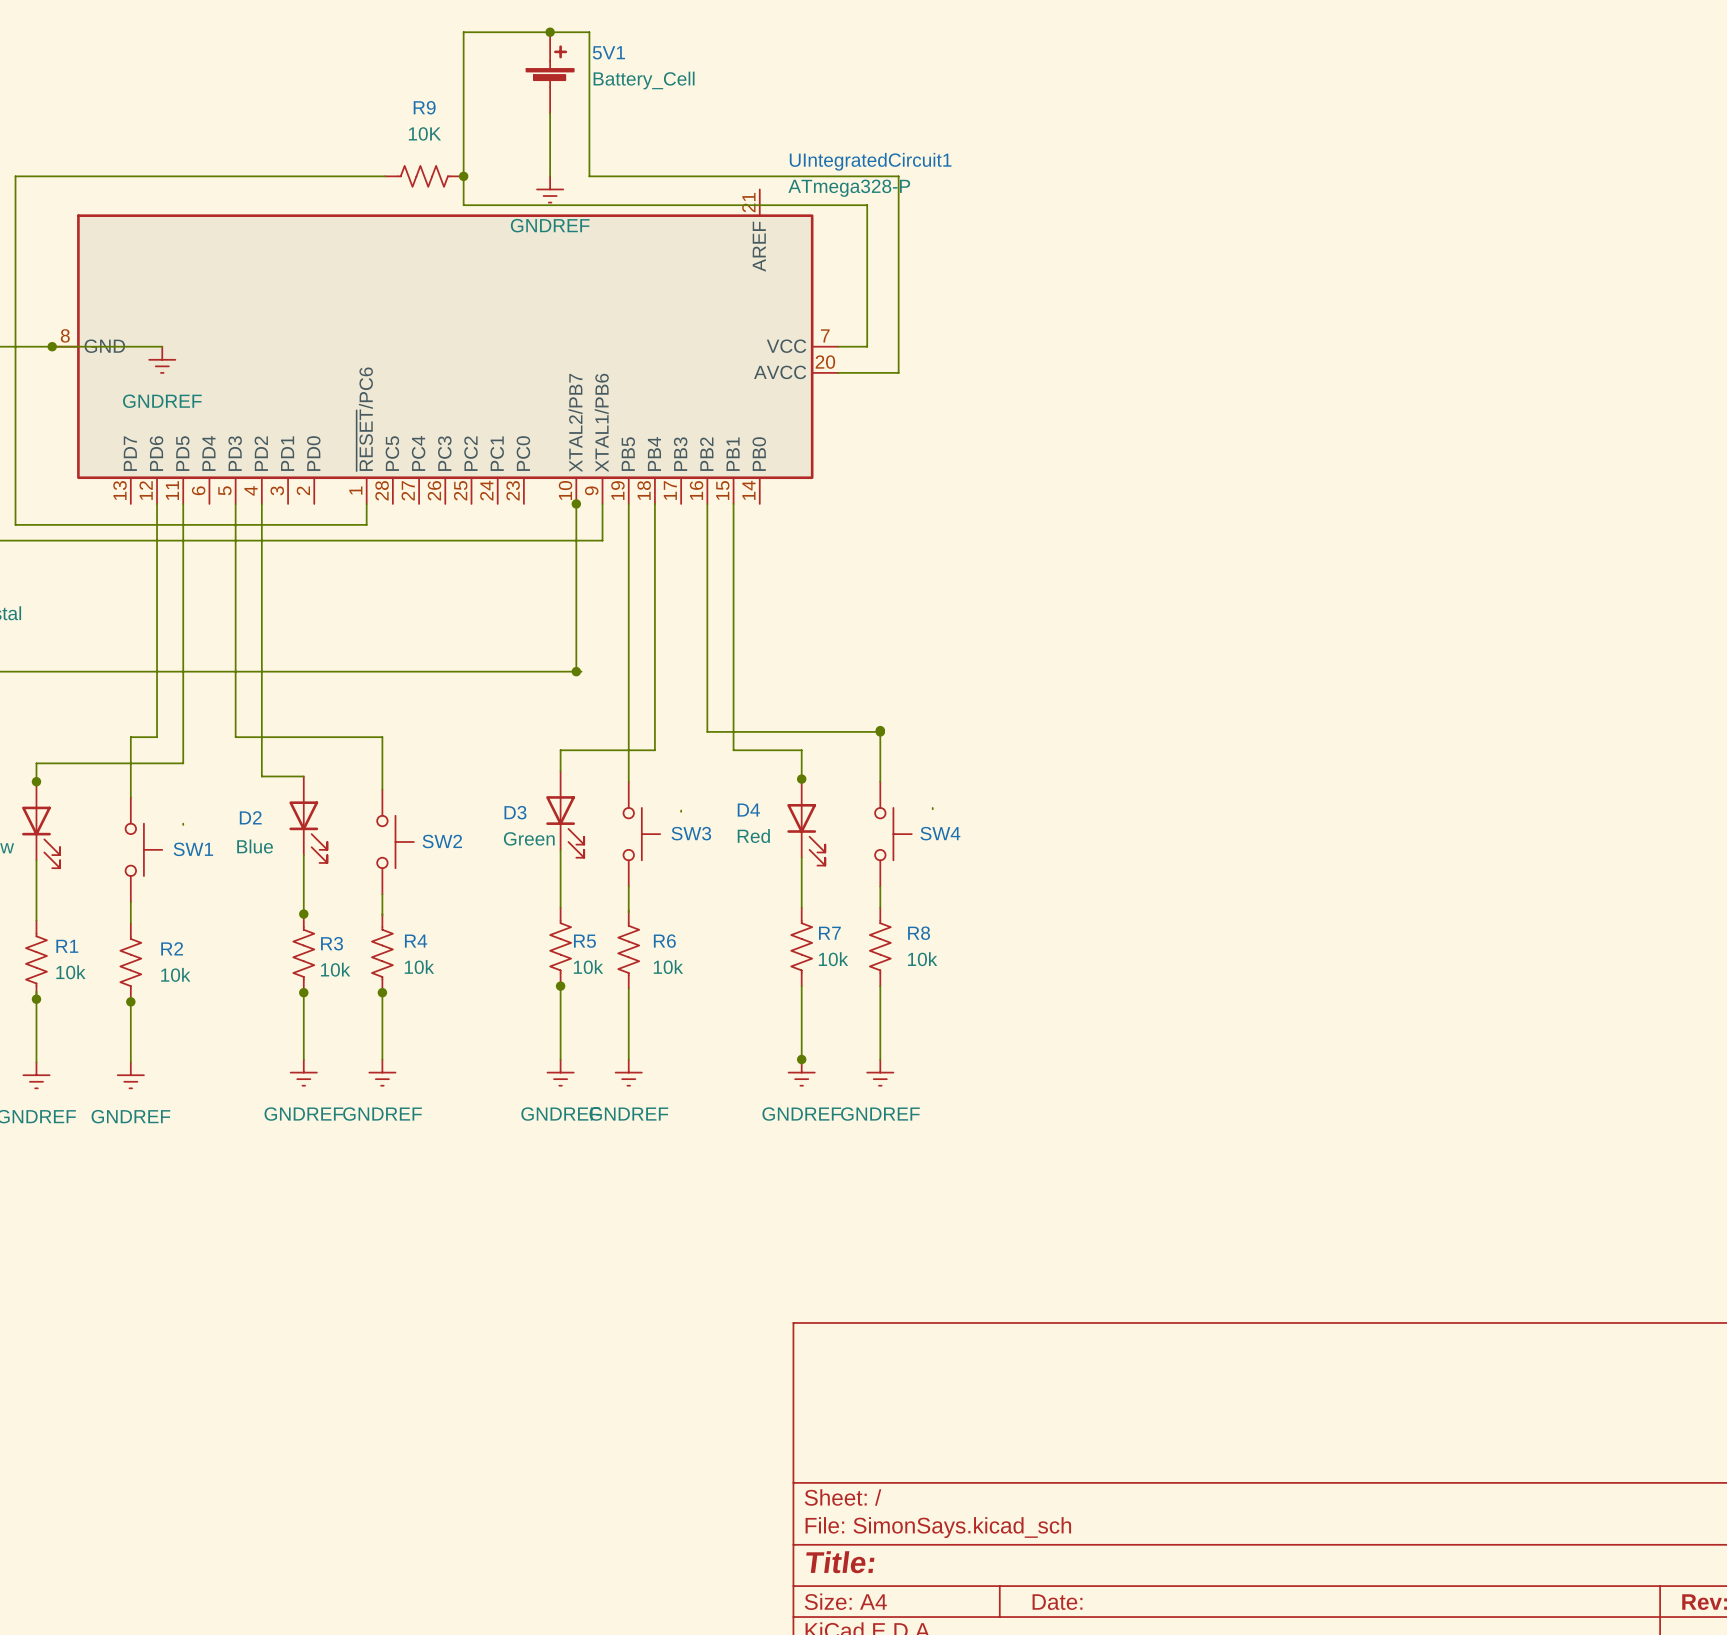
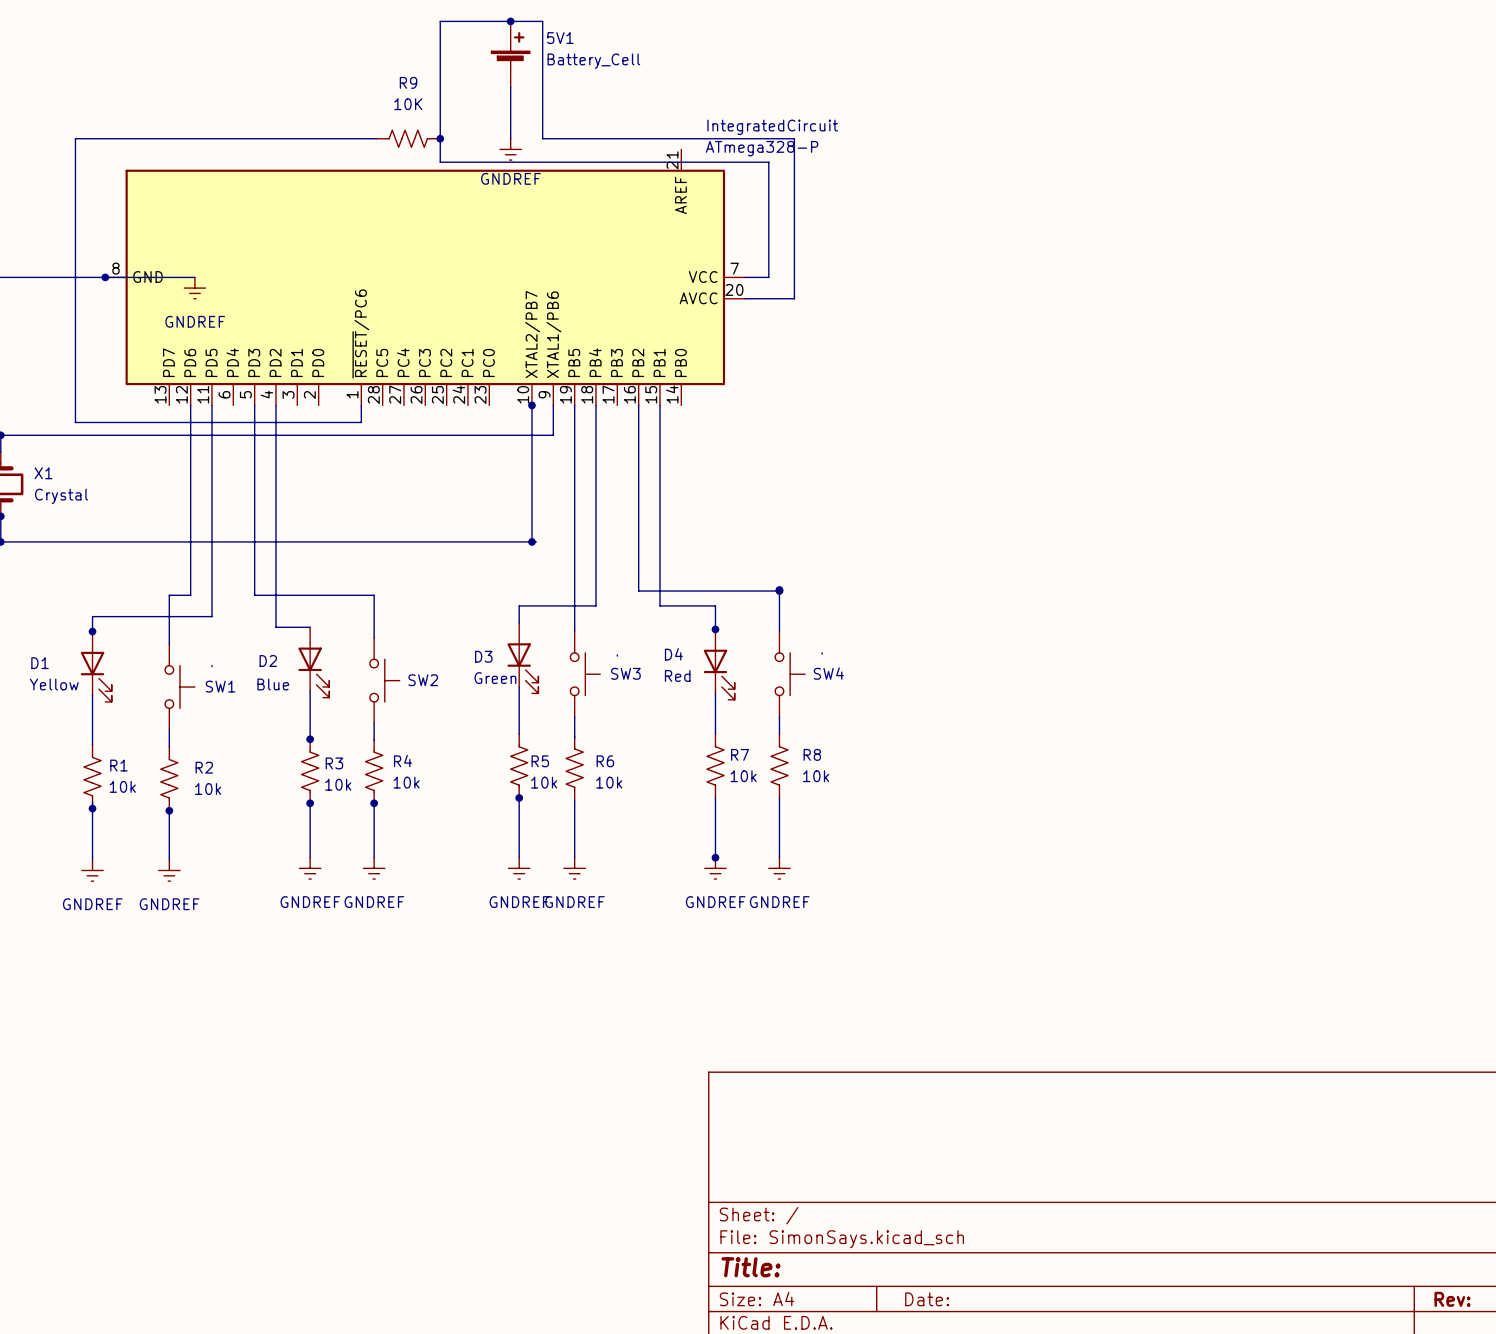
UIntegratedCircuit1 name: UIntegratedCircuit1 (870, 161) -> IntegratedCircuit (772, 127)

